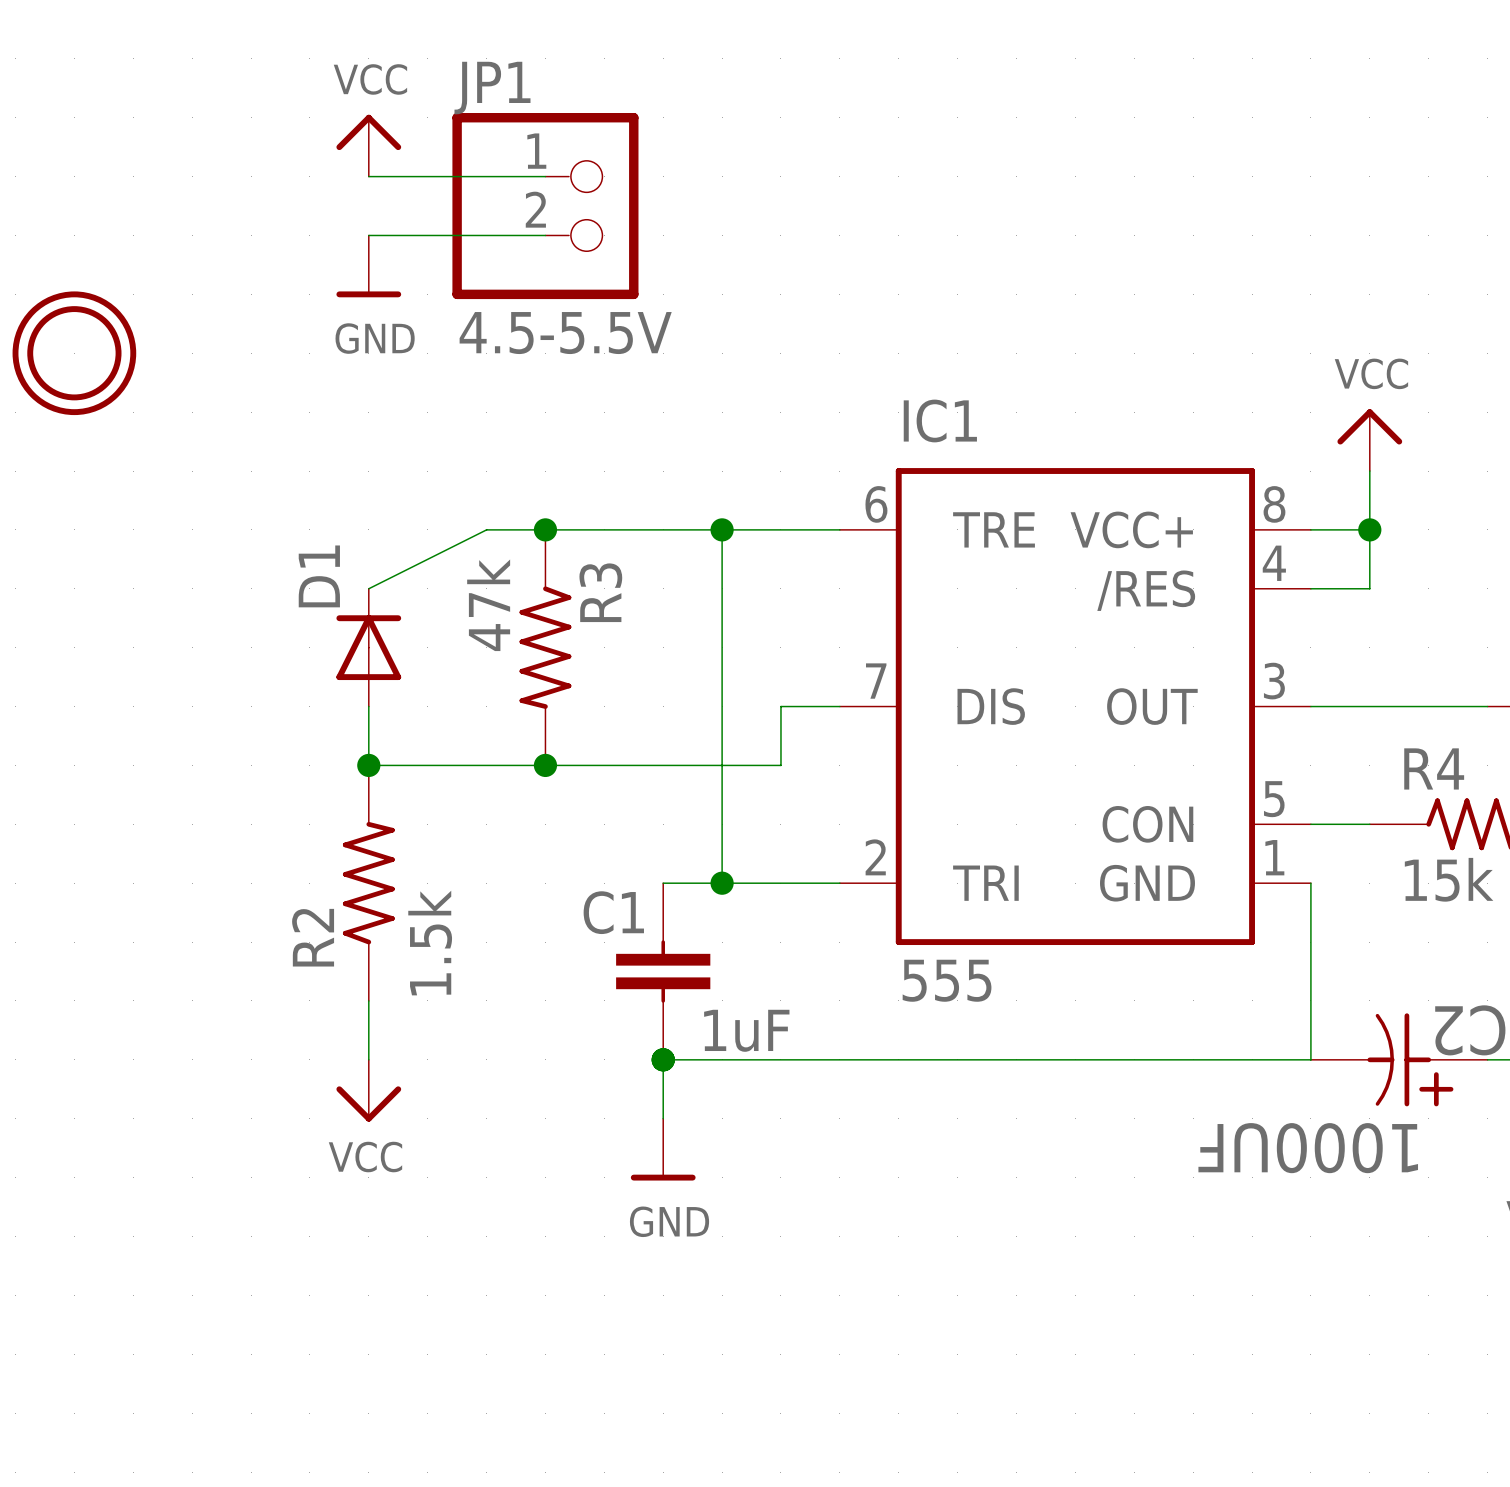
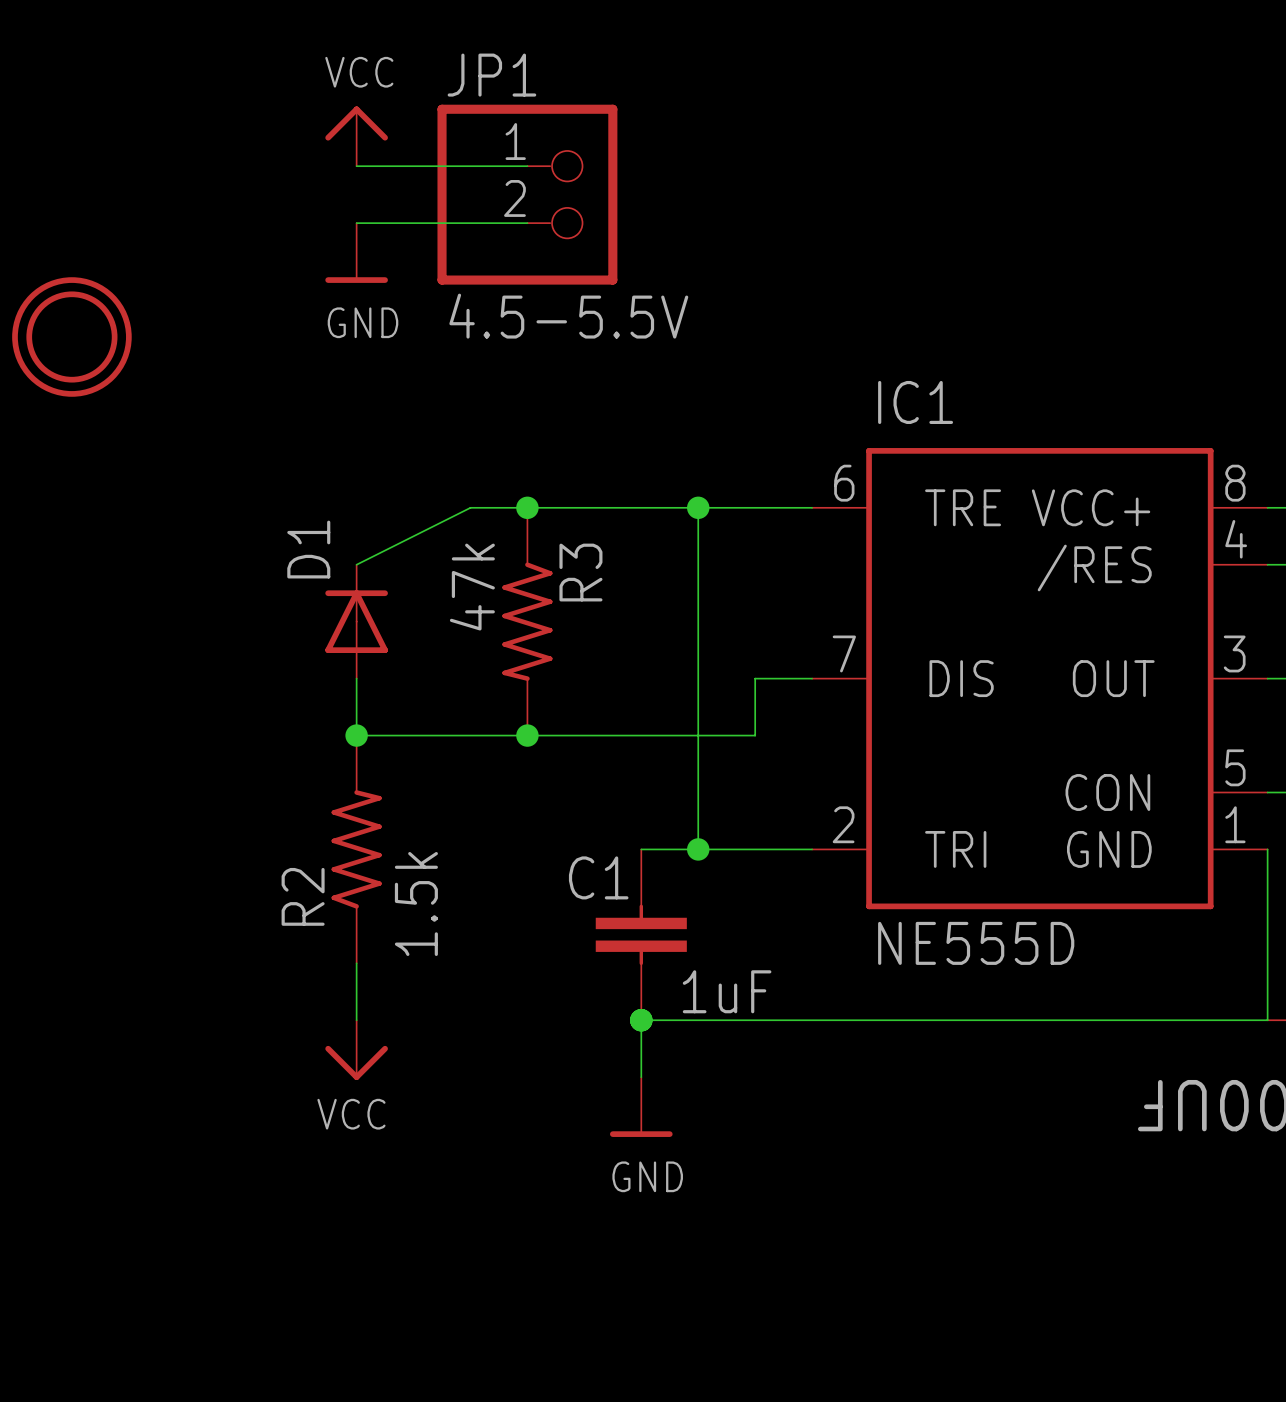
IC1 value: 555 (947, 980) -> NE555D (976, 943)

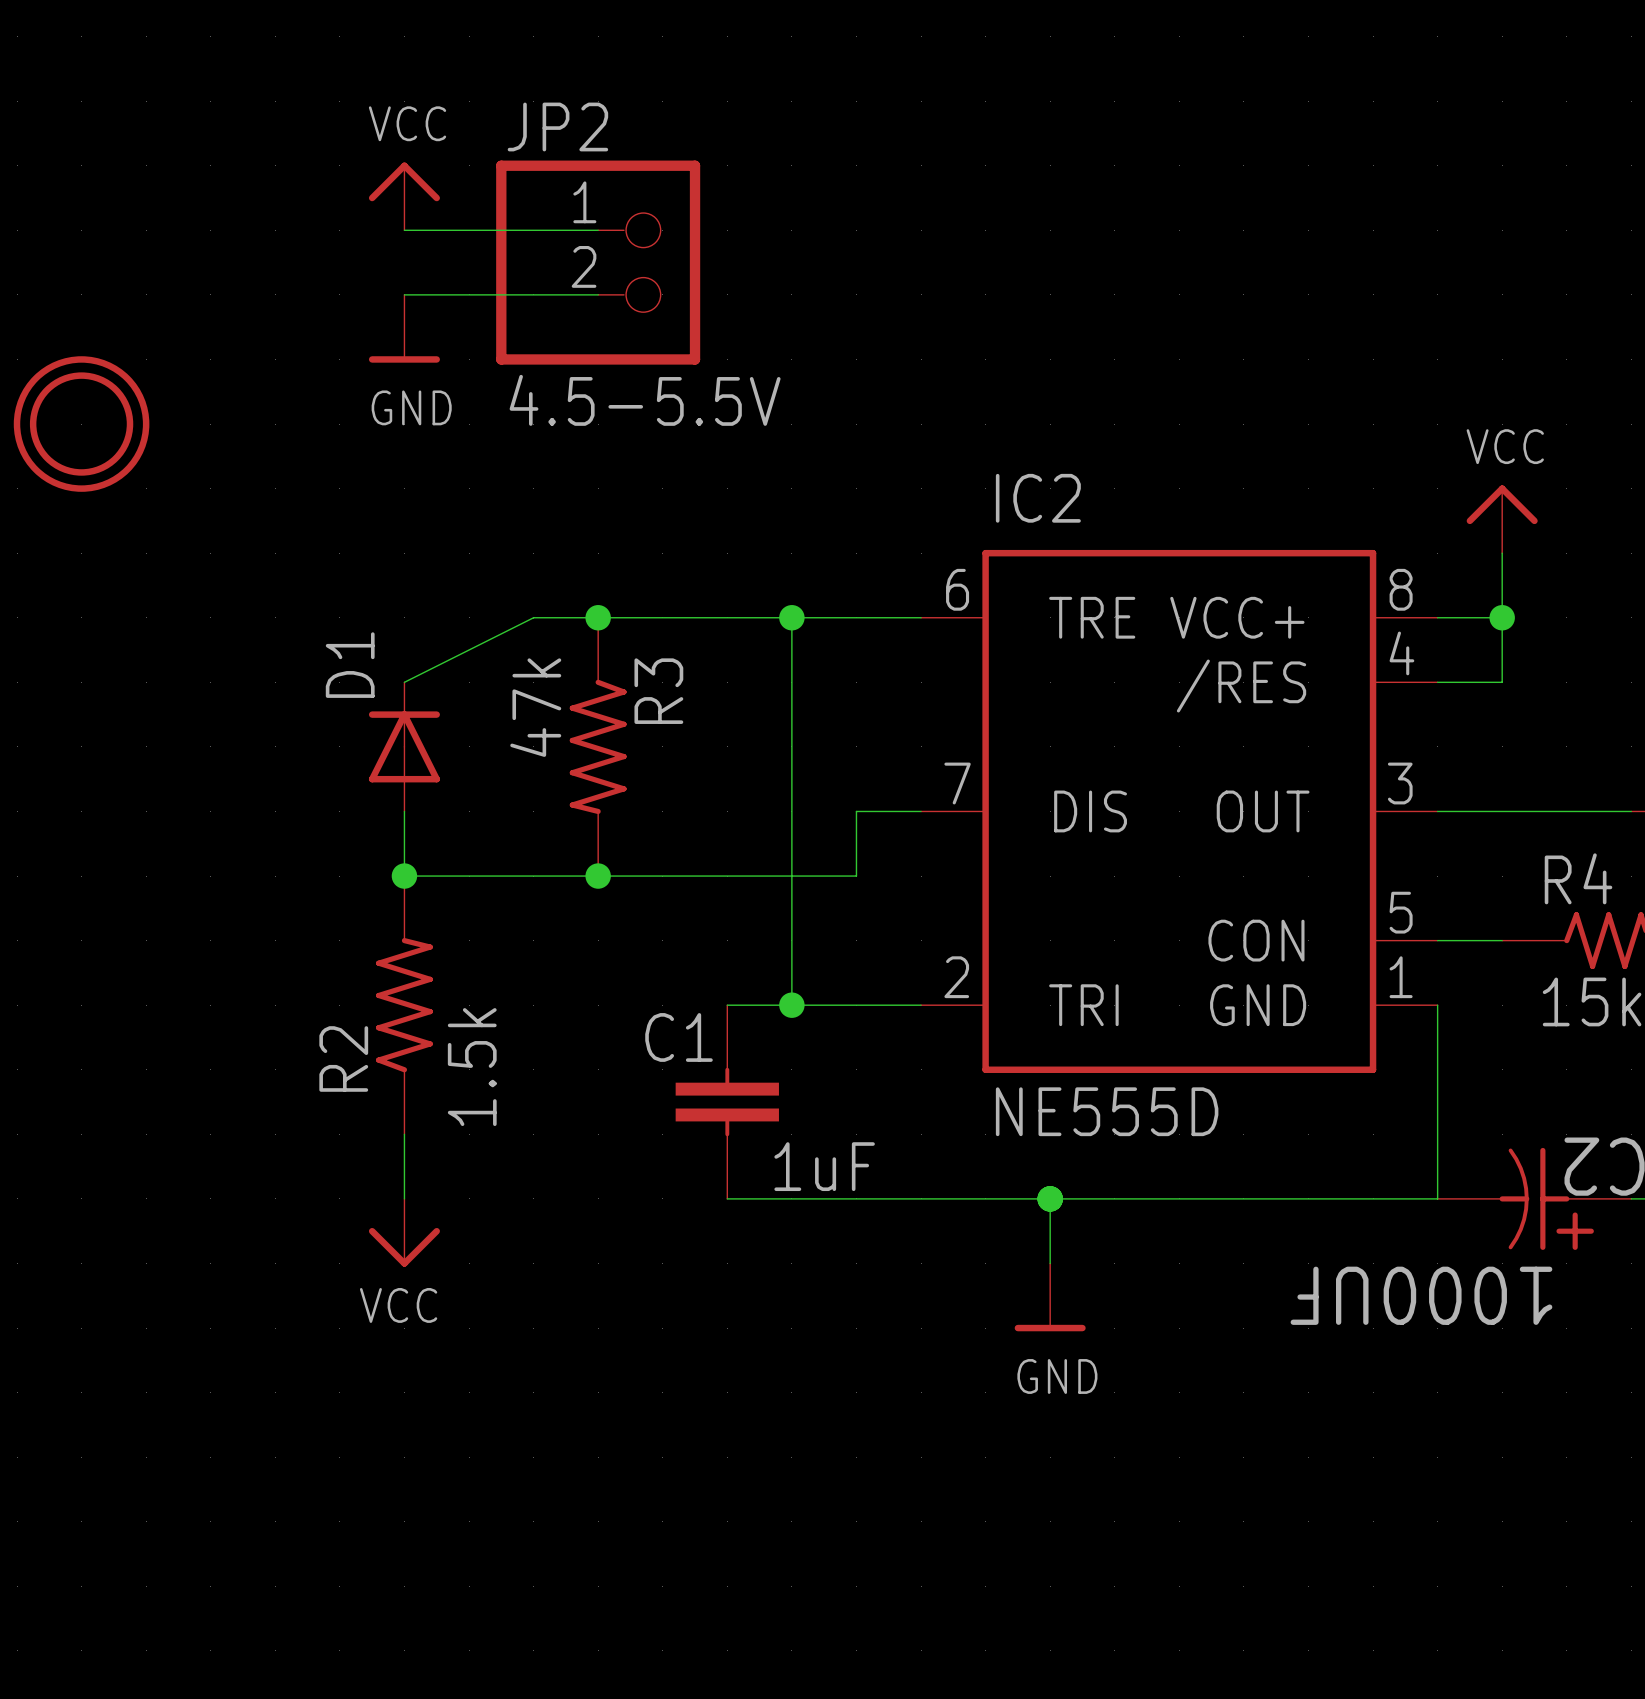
JP1 name: JP1 (491, 75) -> JP2 (557, 126)
IC1 name: IC1 (915, 402) -> IC2 (1038, 498)
wire: (641, 1020) (641, 1077) -> (1050, 1198) (1050, 1263)
junction: (641, 1020) -> none
junction: none -> (1050, 1198)
power symbol position: GND (641, 1107) -> GND (1050, 1297)

